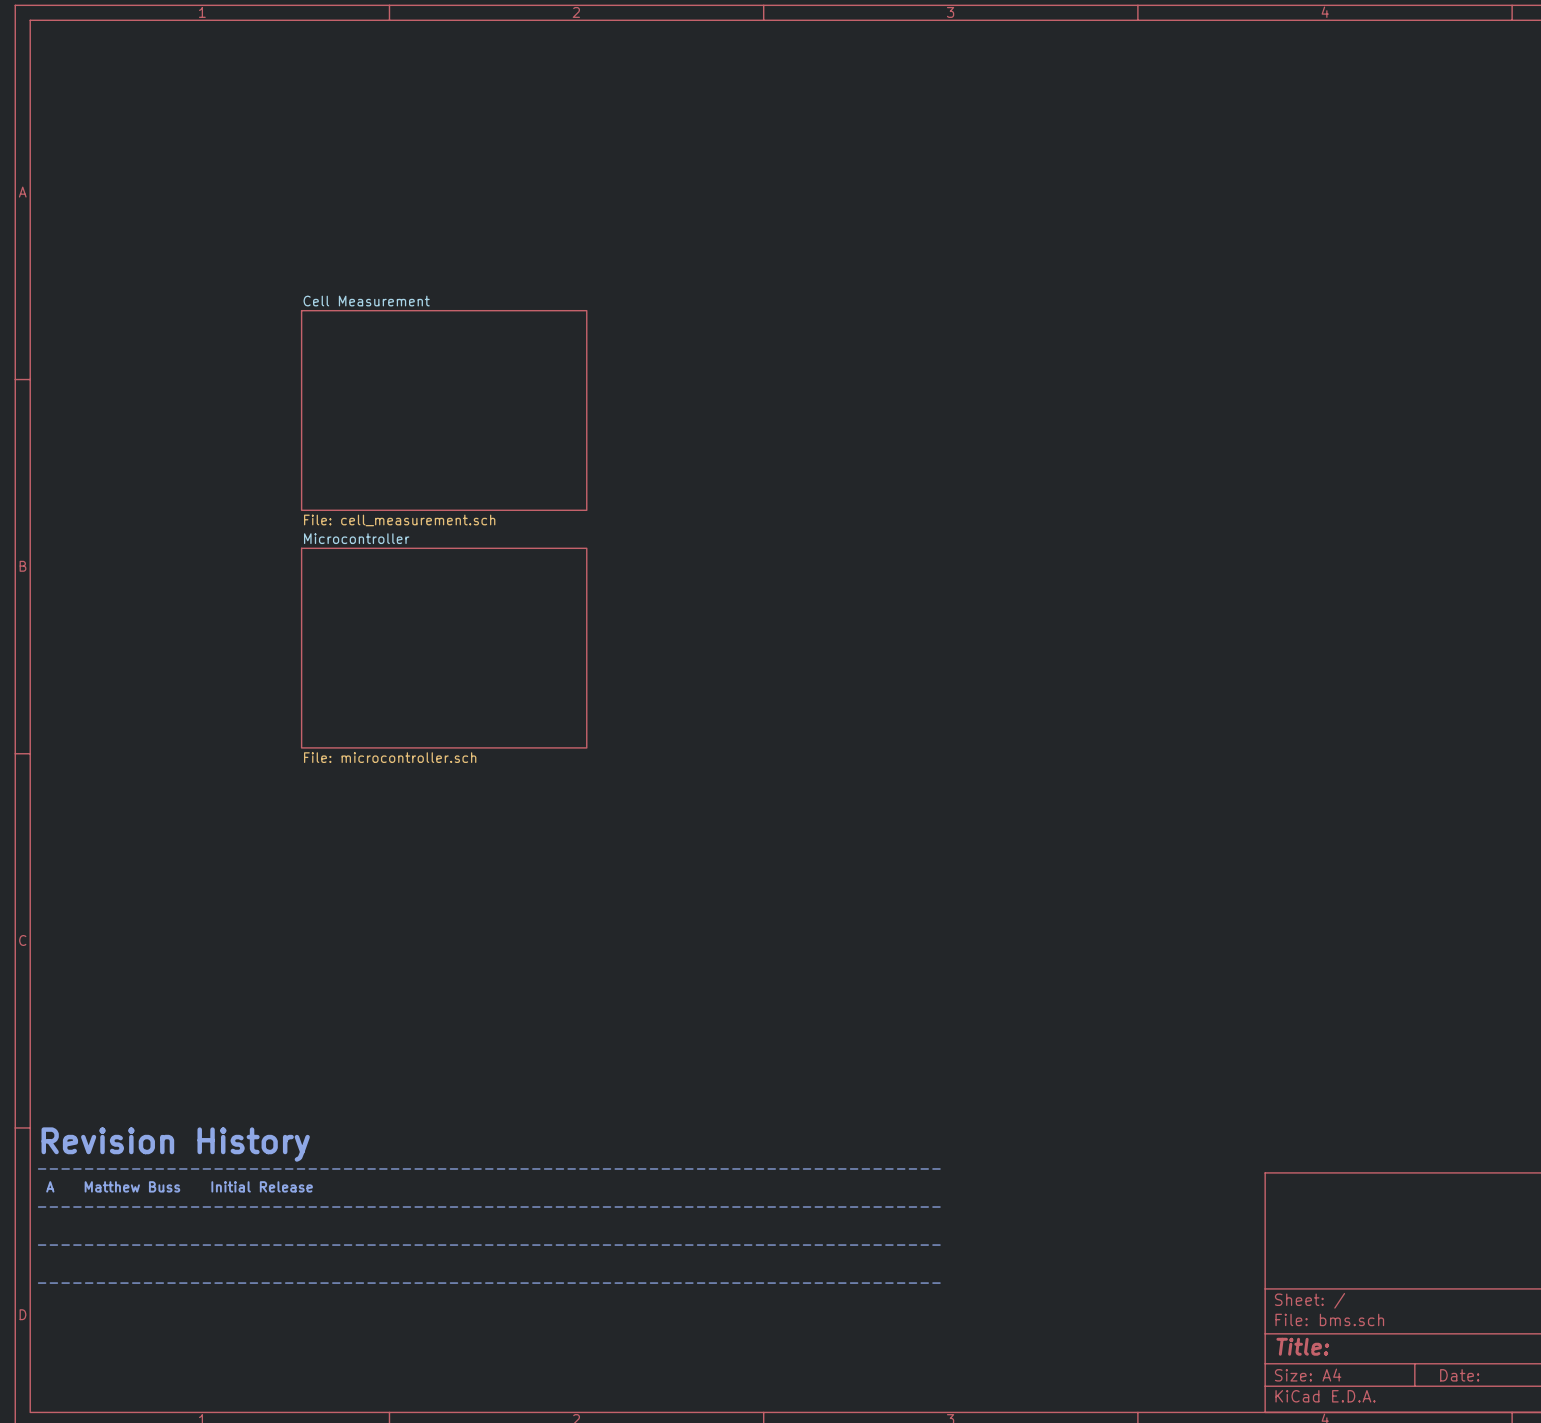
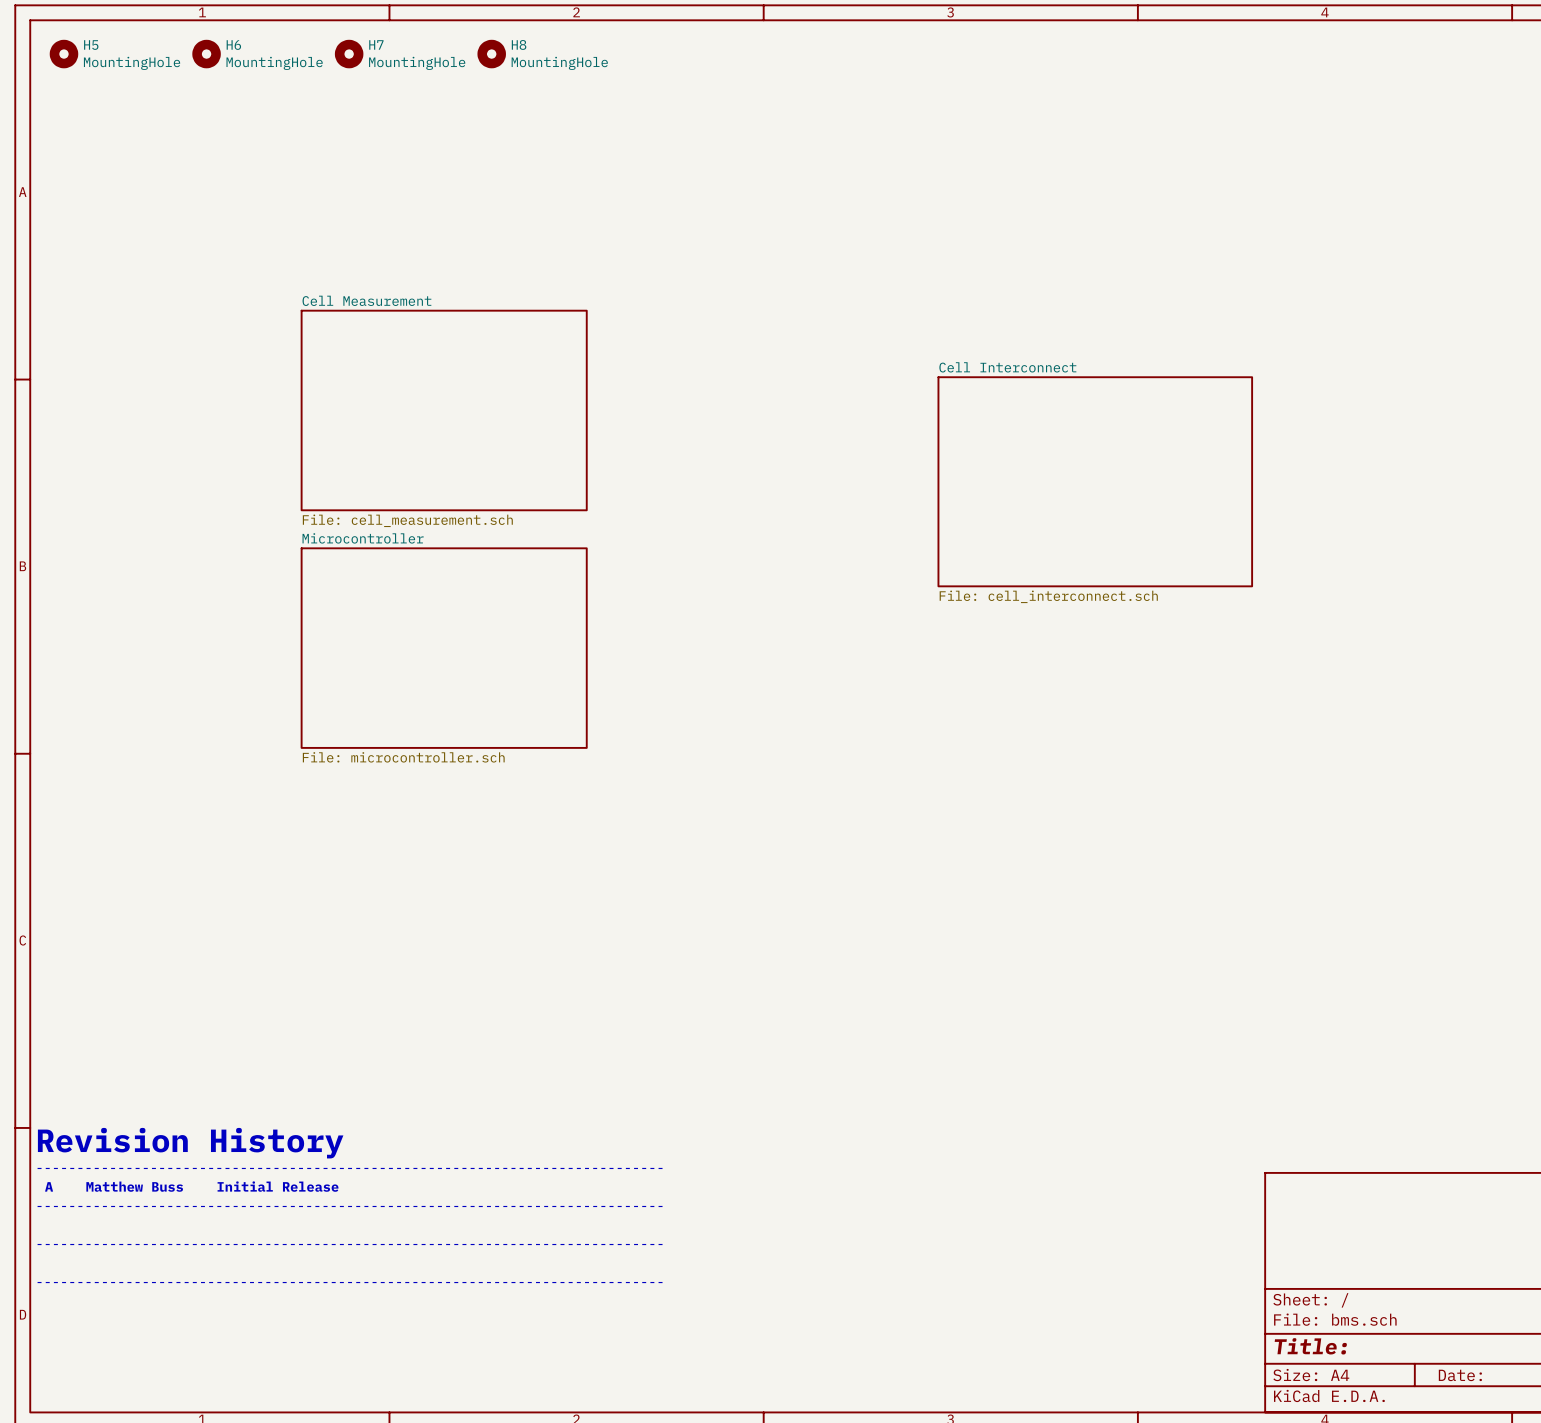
H5: none -> MountingHole (63, 54)
H6: none -> MountingHole (206, 54)
H7: none -> MountingHole (349, 54)
H8: none -> MountingHole (491, 54)
sheet Cell Interconnect: none -> File: cell_interconnect.sch (1095, 481)

